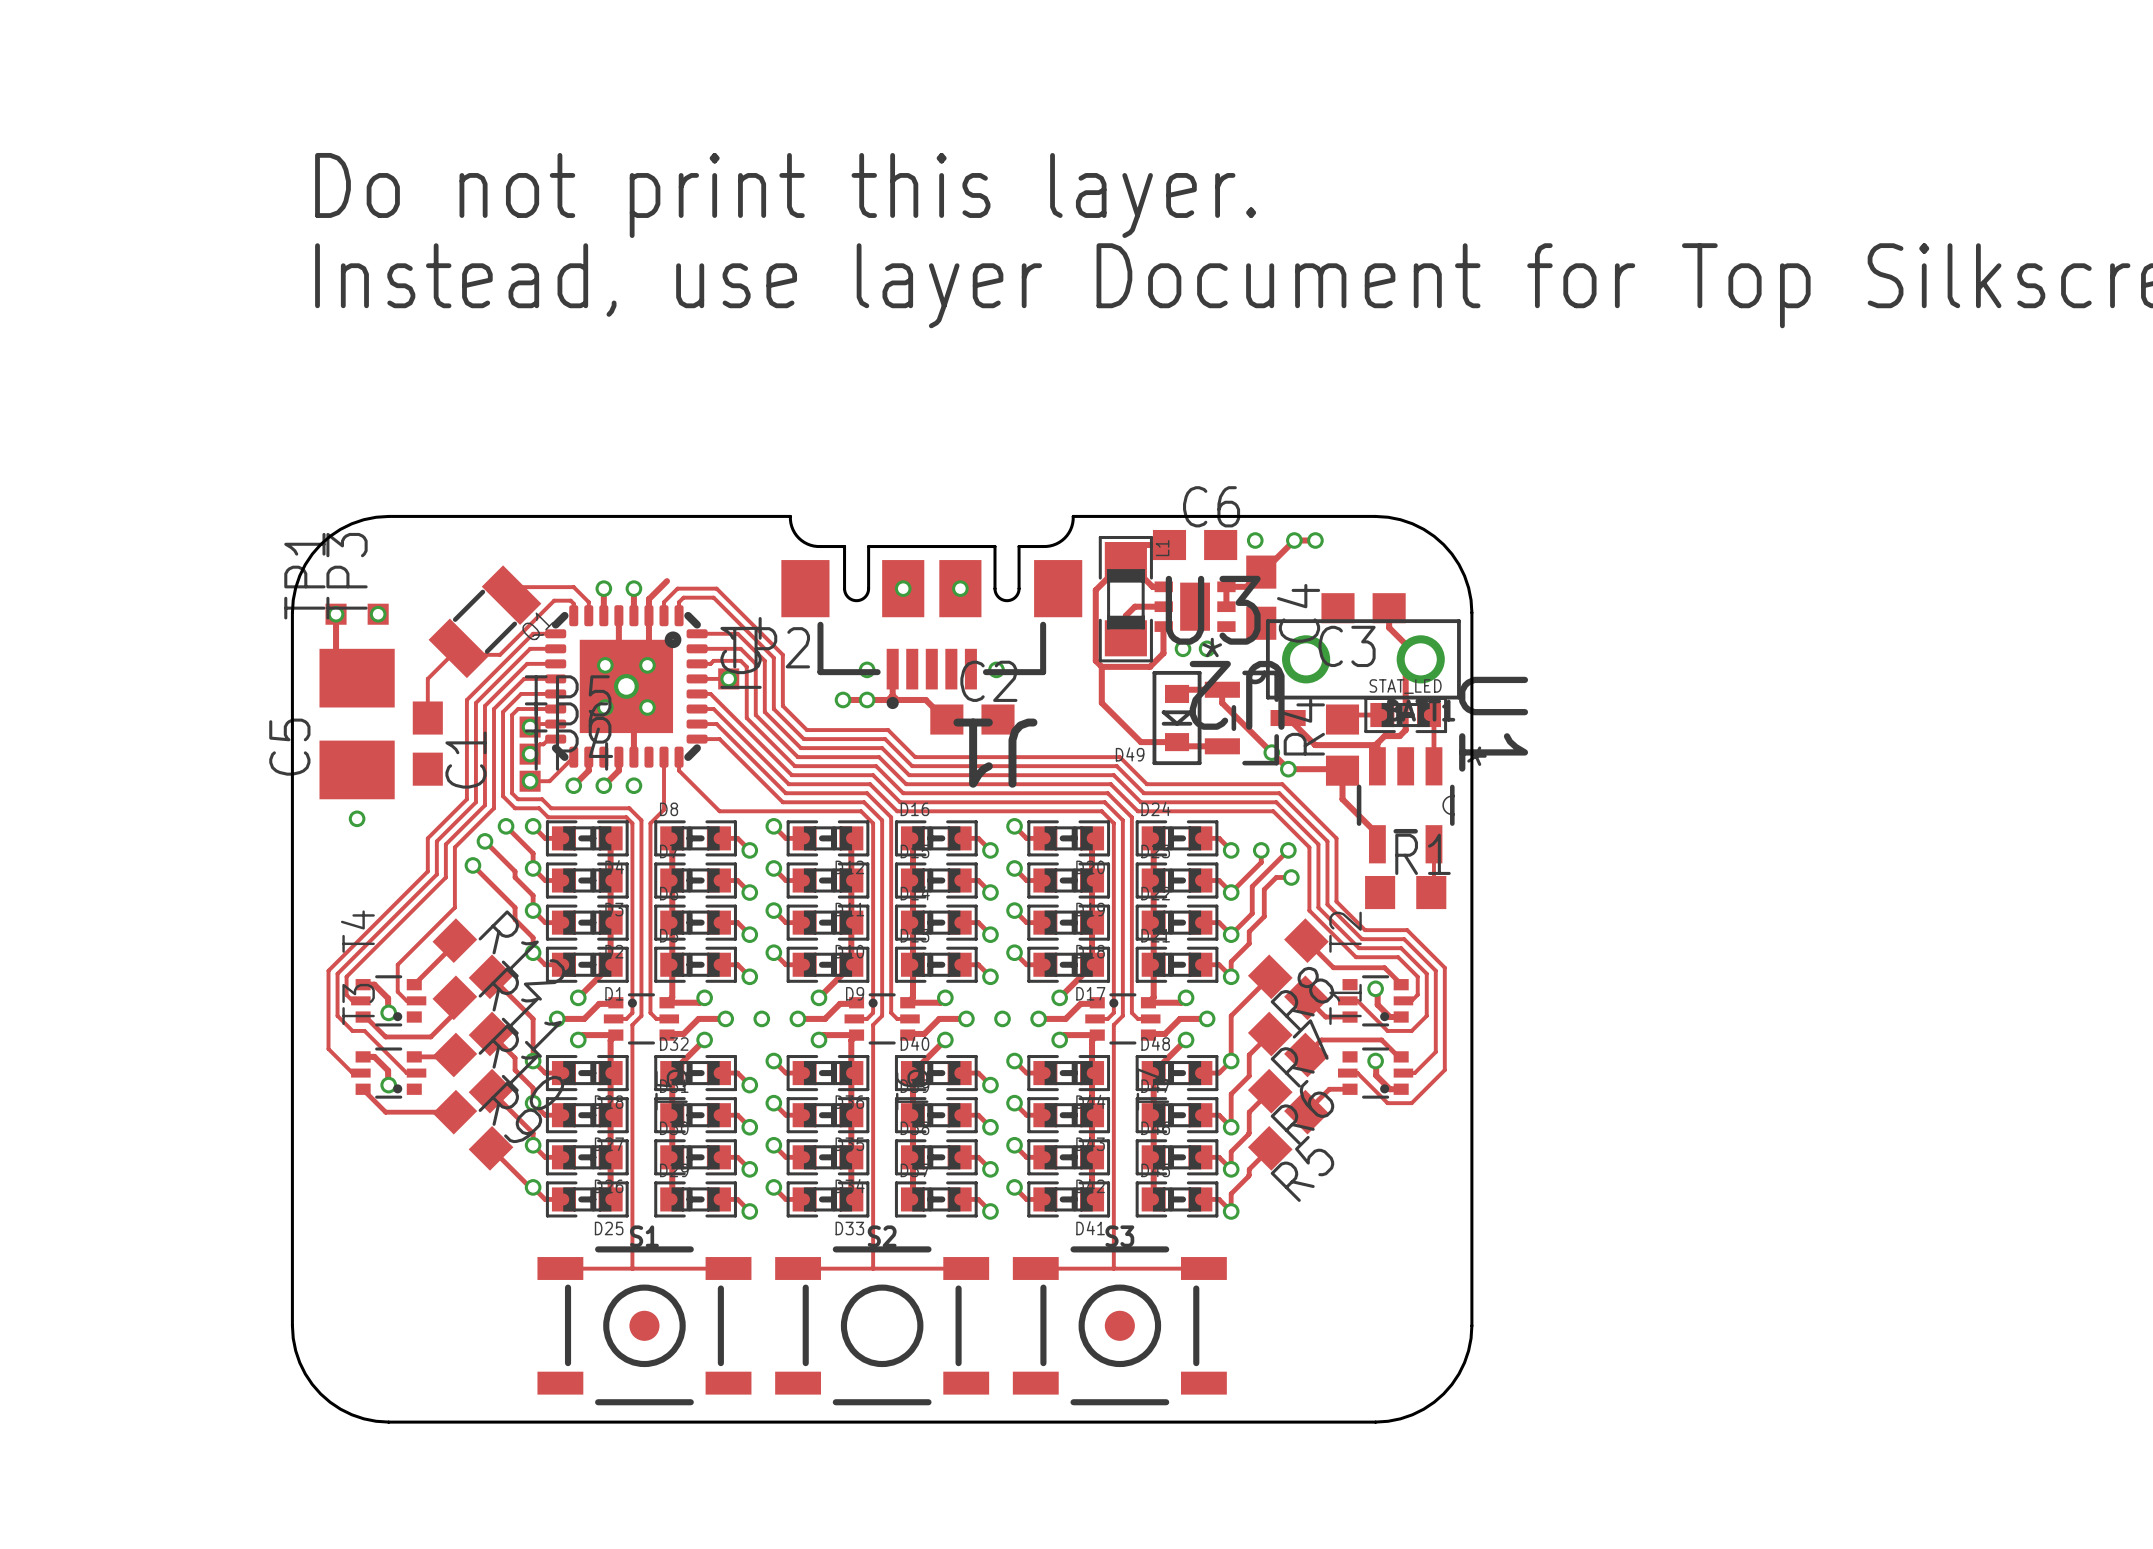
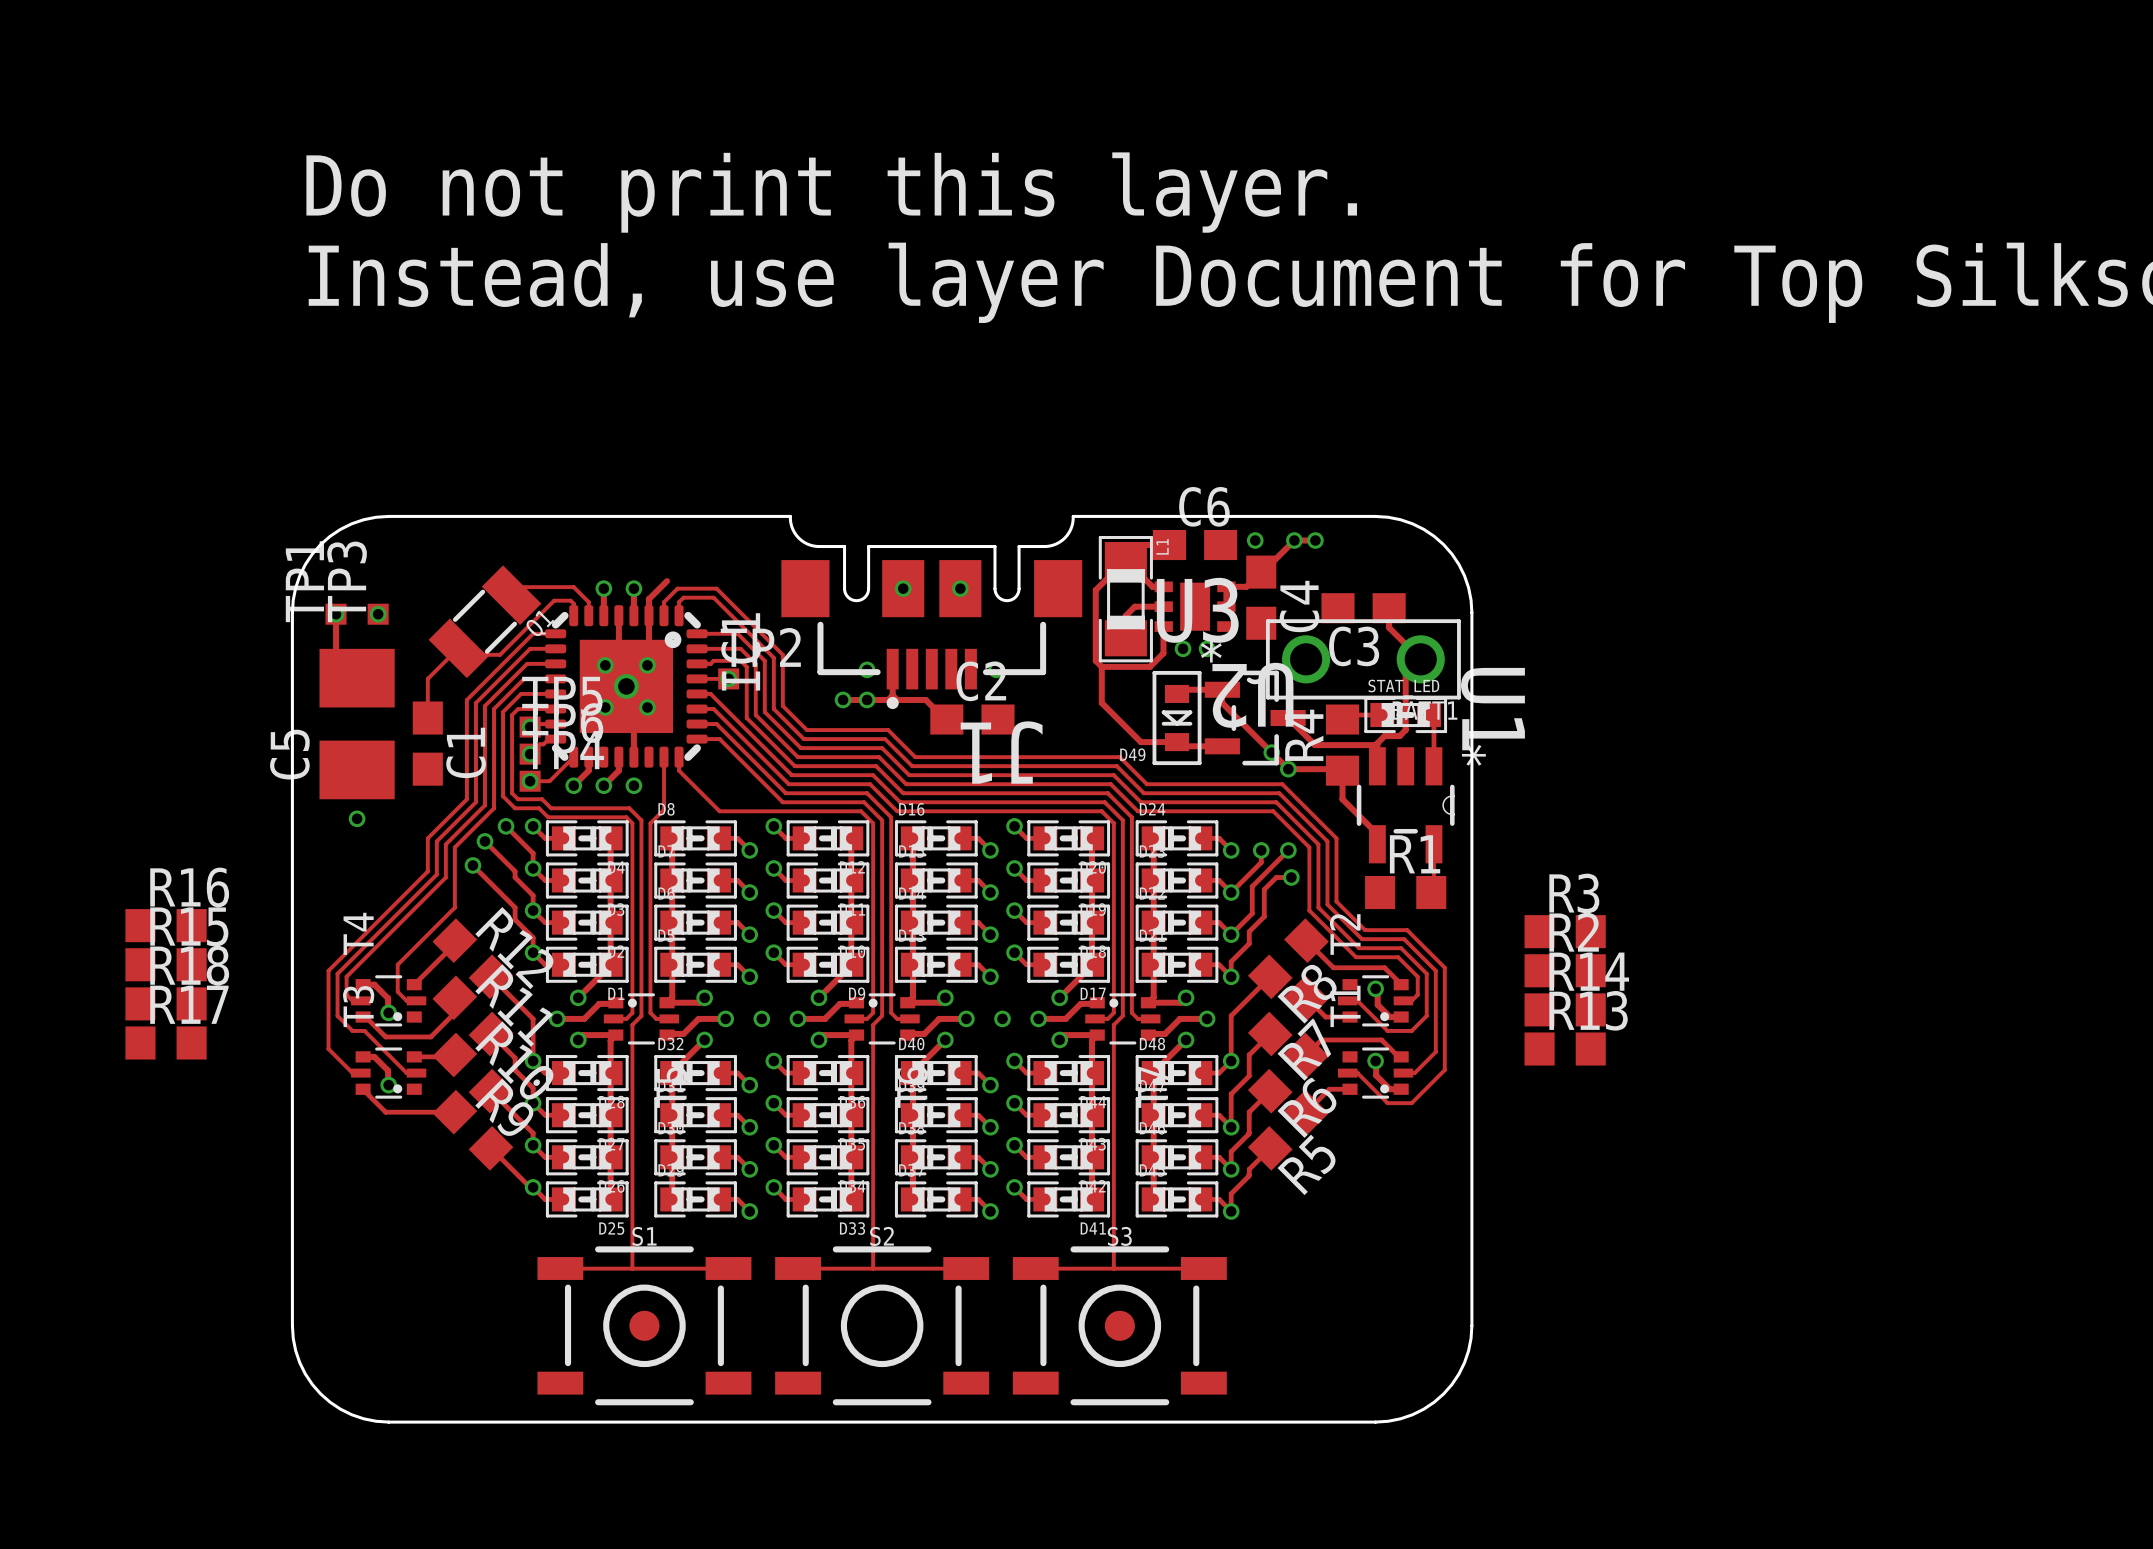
R16: none -> (166, 925)
R3: none -> (1565, 931)
R15: none -> (166, 964)
R2: none -> (1565, 970)
R18: none -> (166, 1003)
R14: none -> (1565, 1009)
R17: none -> (166, 1042)
R13: none -> (1565, 1049)

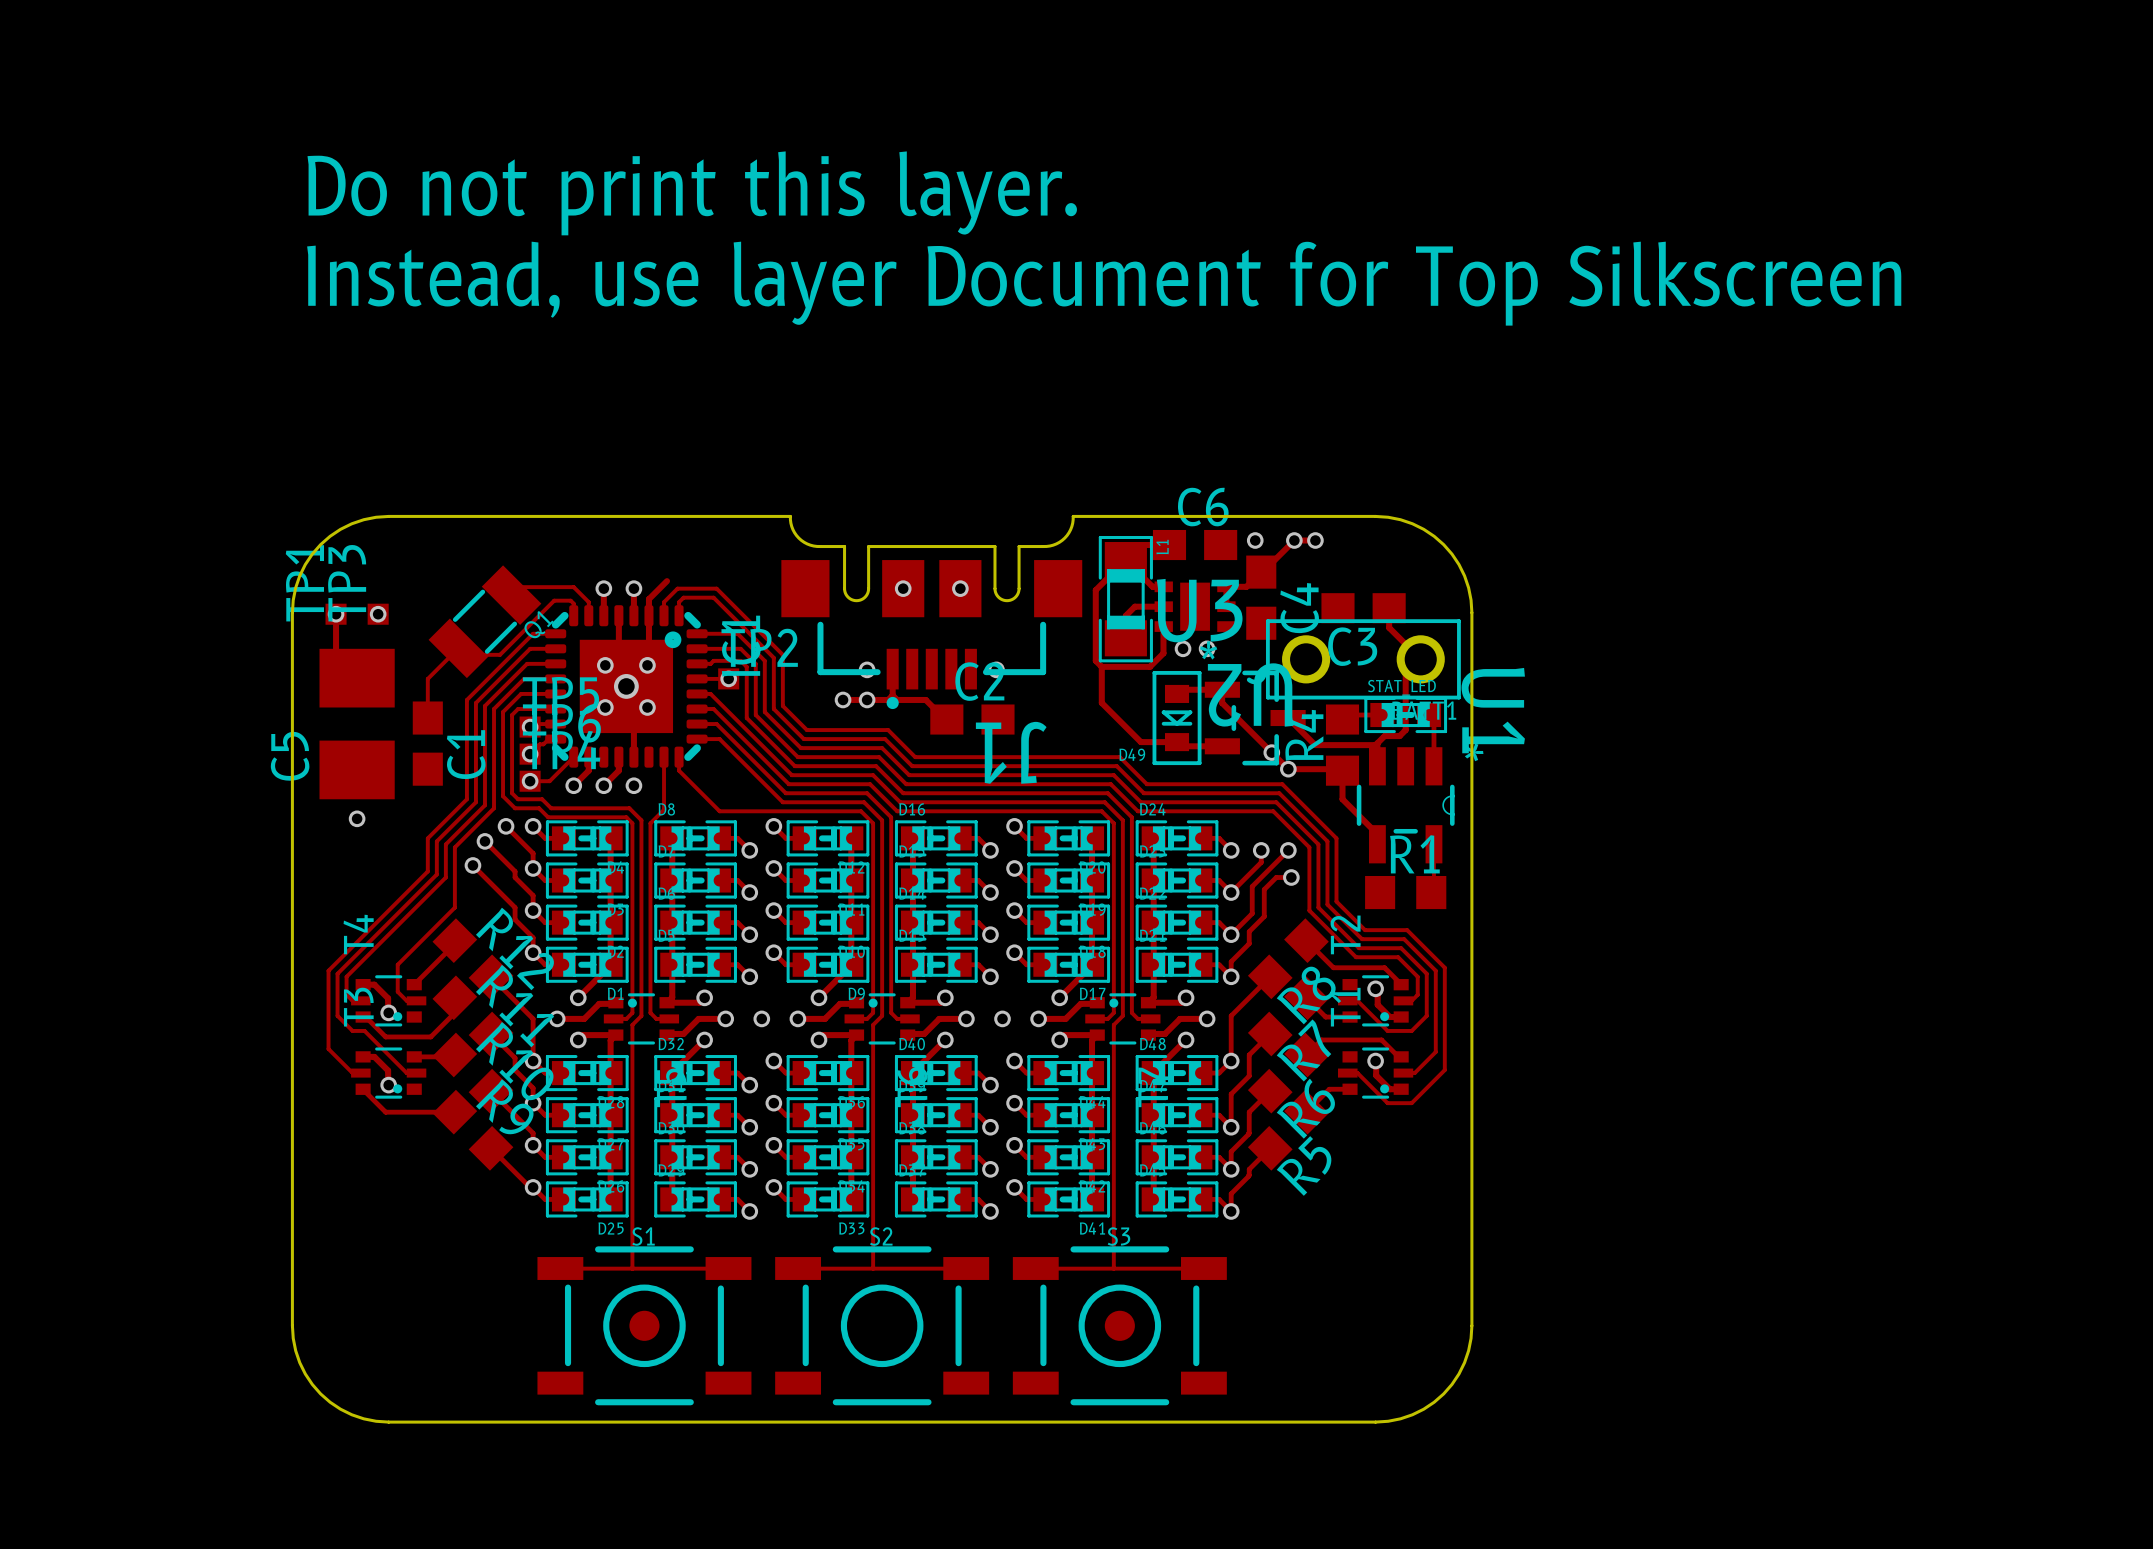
R16: (166, 925) -> none
R3: (1565, 931) -> none
R15: (166, 964) -> none
R2: (1565, 970) -> none
R18: (166, 1003) -> none
R14: (1565, 1009) -> none
R17: (166, 1042) -> none
R13: (1565, 1049) -> none

